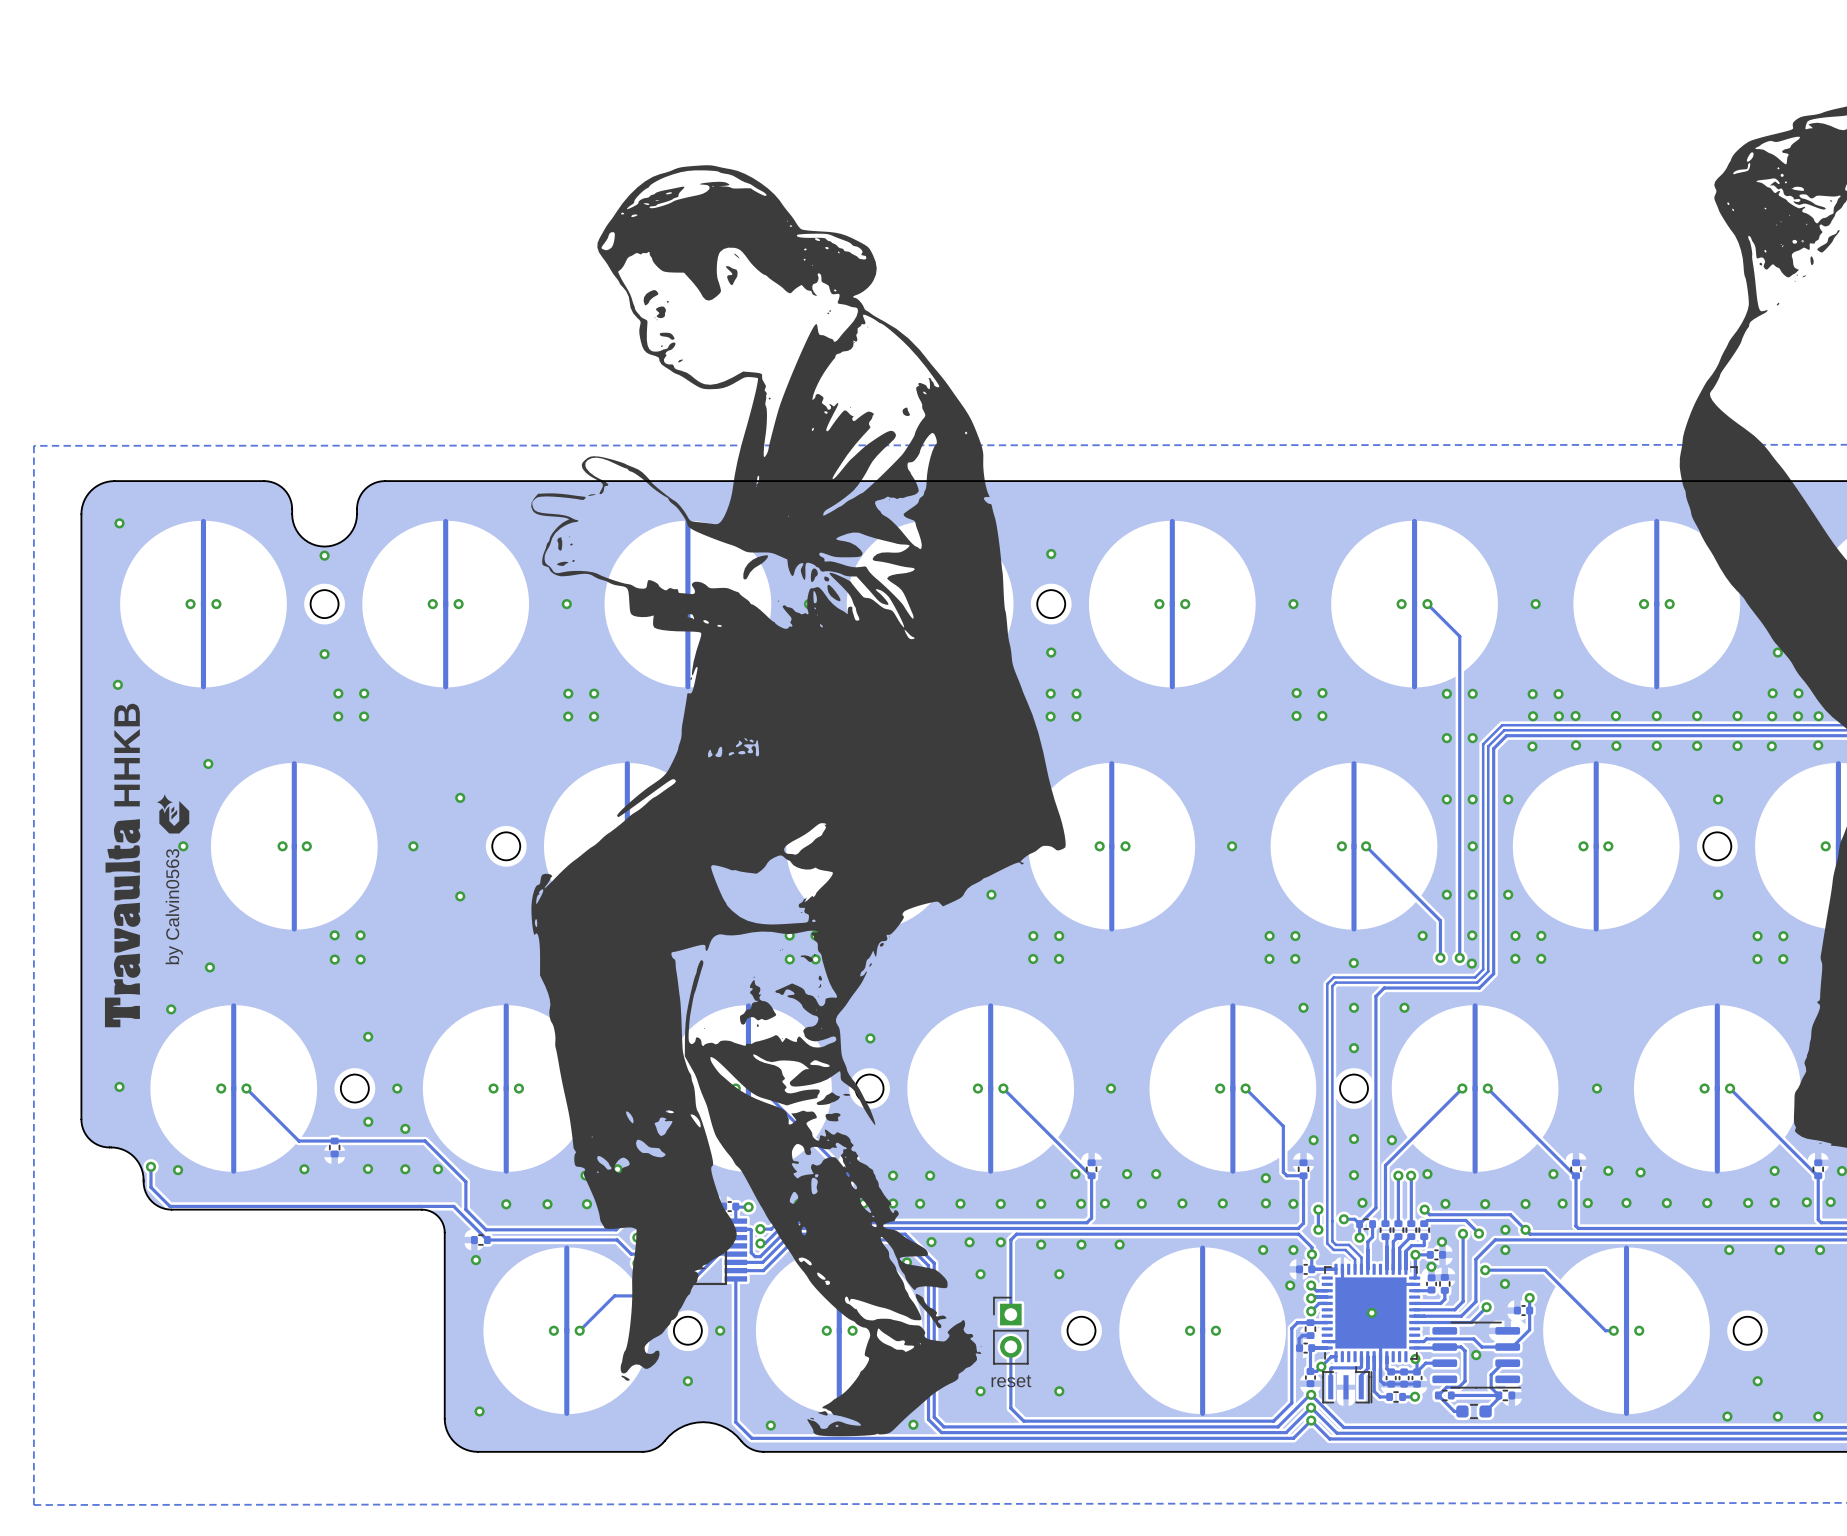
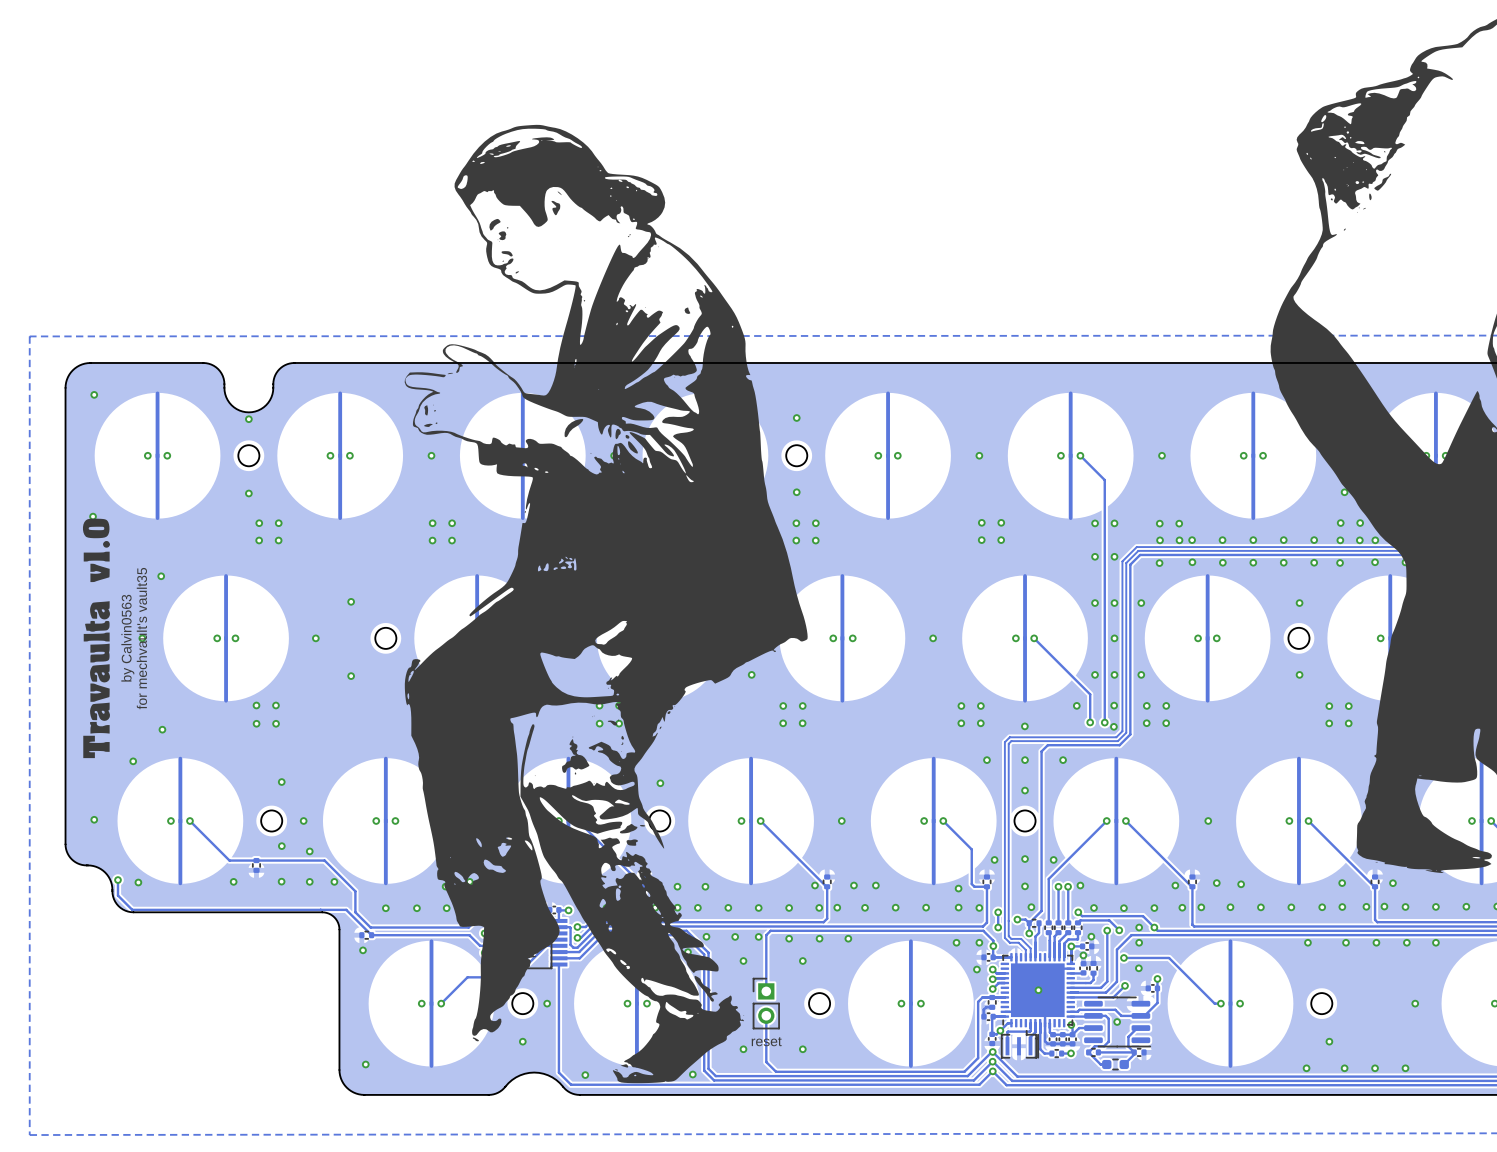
drawing: none -> [82, 518, 111, 759]
text: HHKB (127, 755) -> none
drawing: [156, 794, 190, 834] -> none
drawing: [104, 819, 141, 1028] -> none
text: none -> for mechvault's vault35 (141, 638)
text position: by Calvin0563 (174, 906) -> by Calvin0563 (127, 638)

